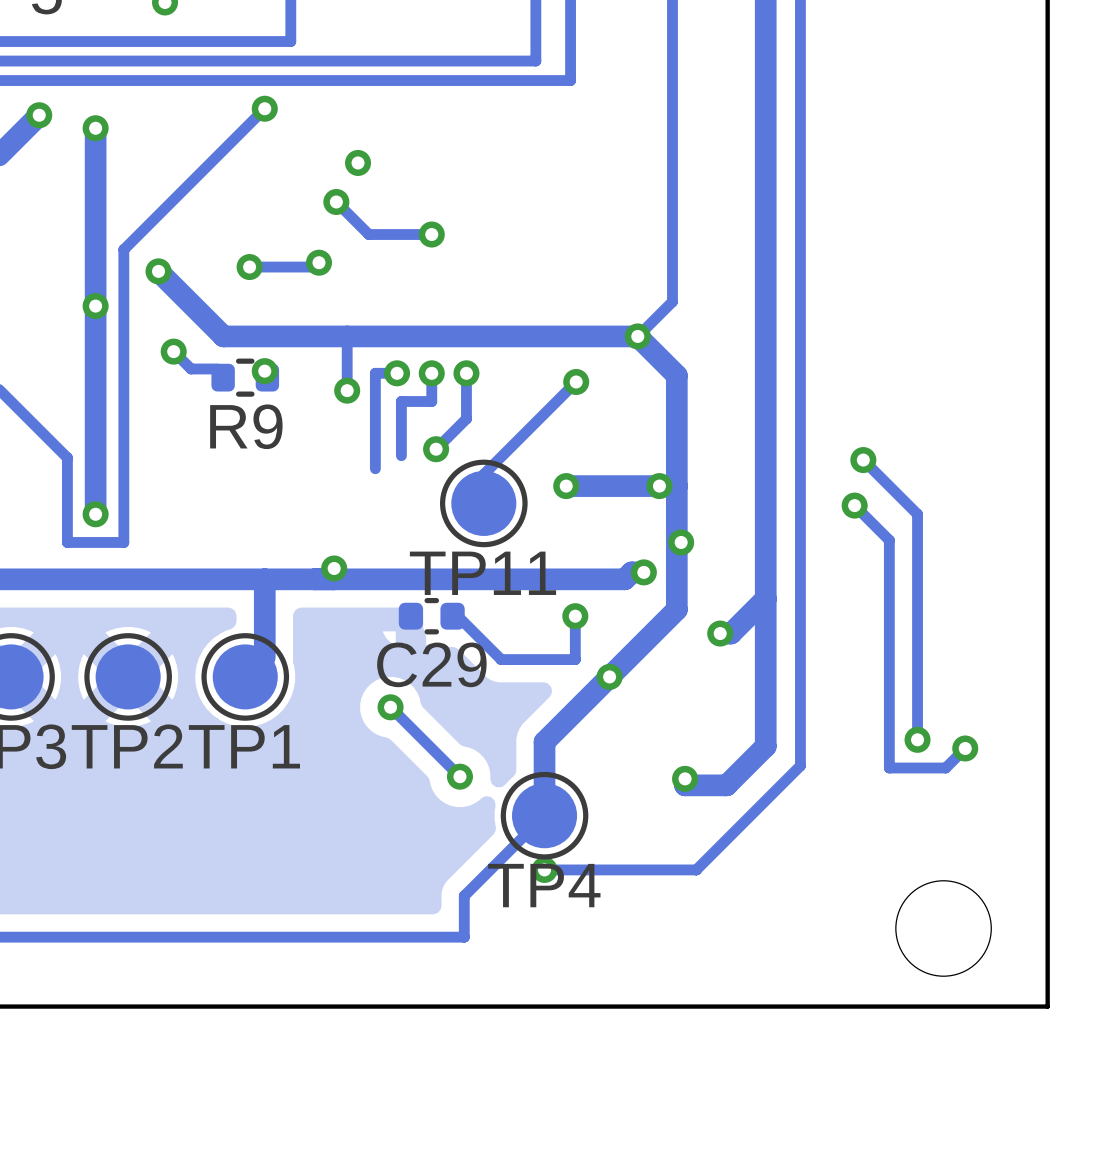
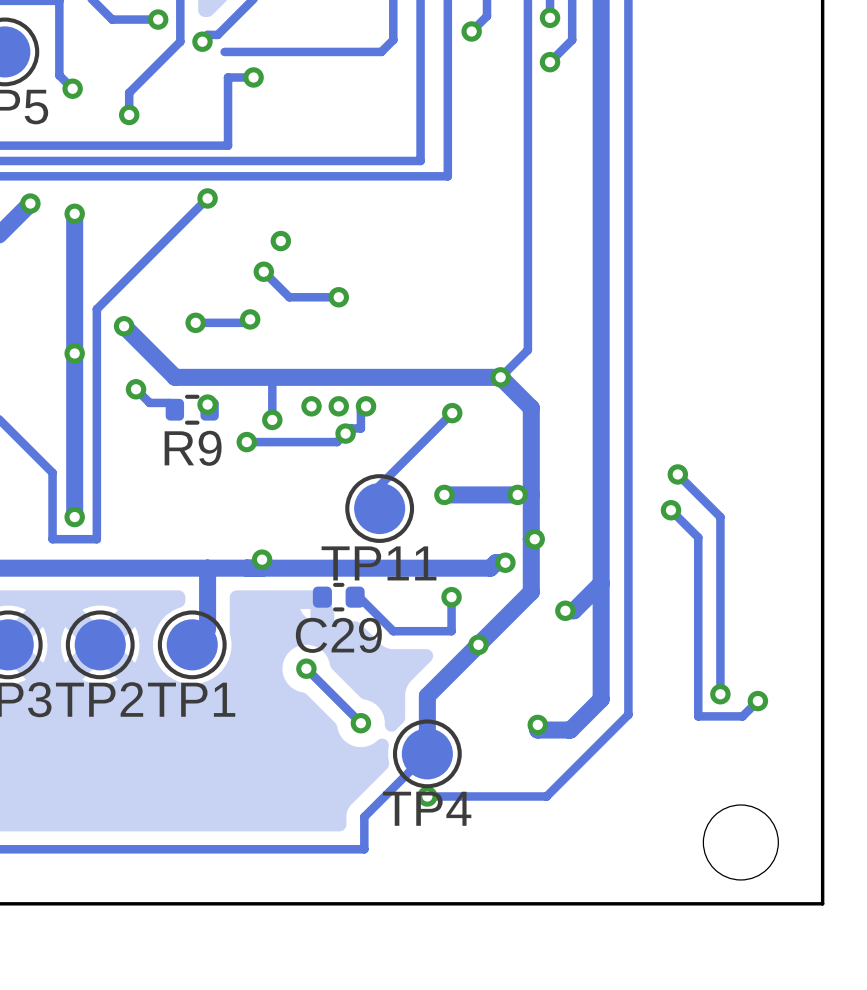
track: none -> (367, 404) (360, 411) (360, 428) (350, 428) (337, 442) (246, 442)
track: (397, 373) (375, 373) (375, 468) -> none
track: (431, 373) (431, 401) (401, 401) (401, 455) -> none
track: (466, 373) (466, 418) (436, 449) -> none
via: none -> (246, 442)
via position: (436, 449) -> (345, 433)

